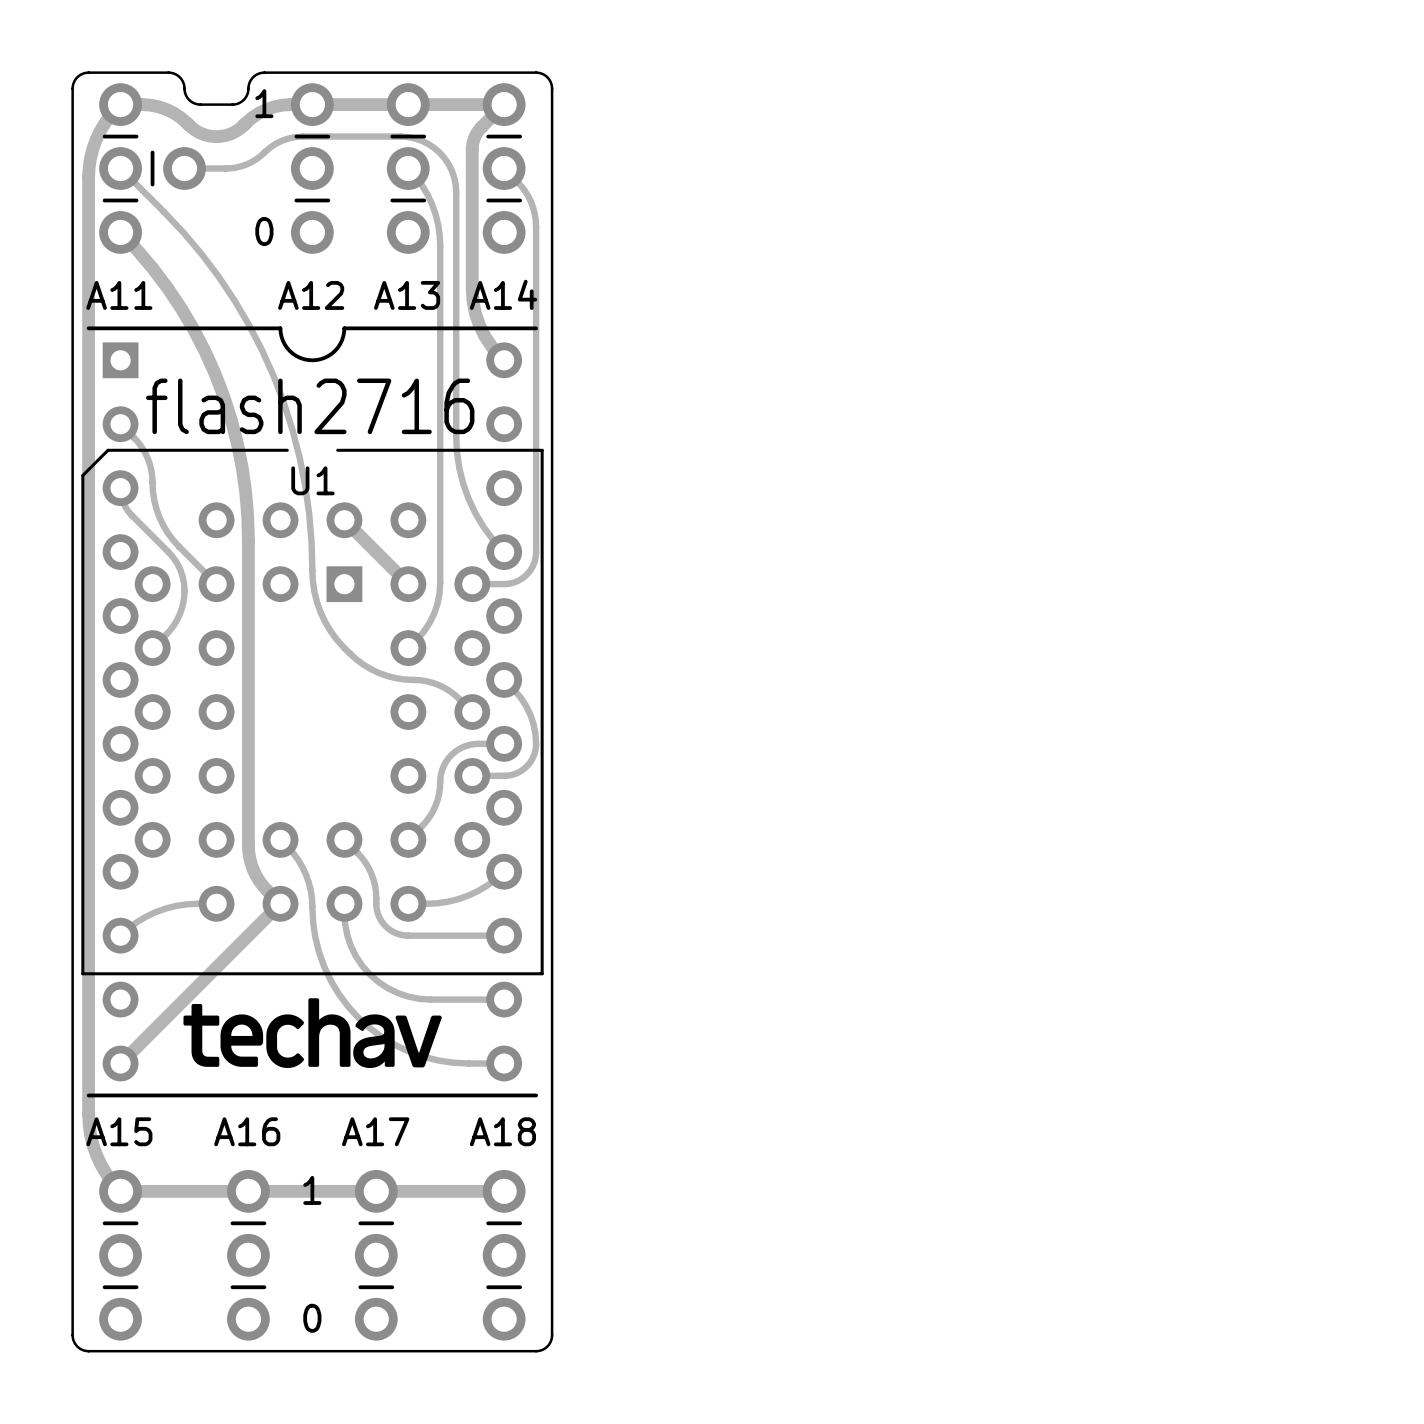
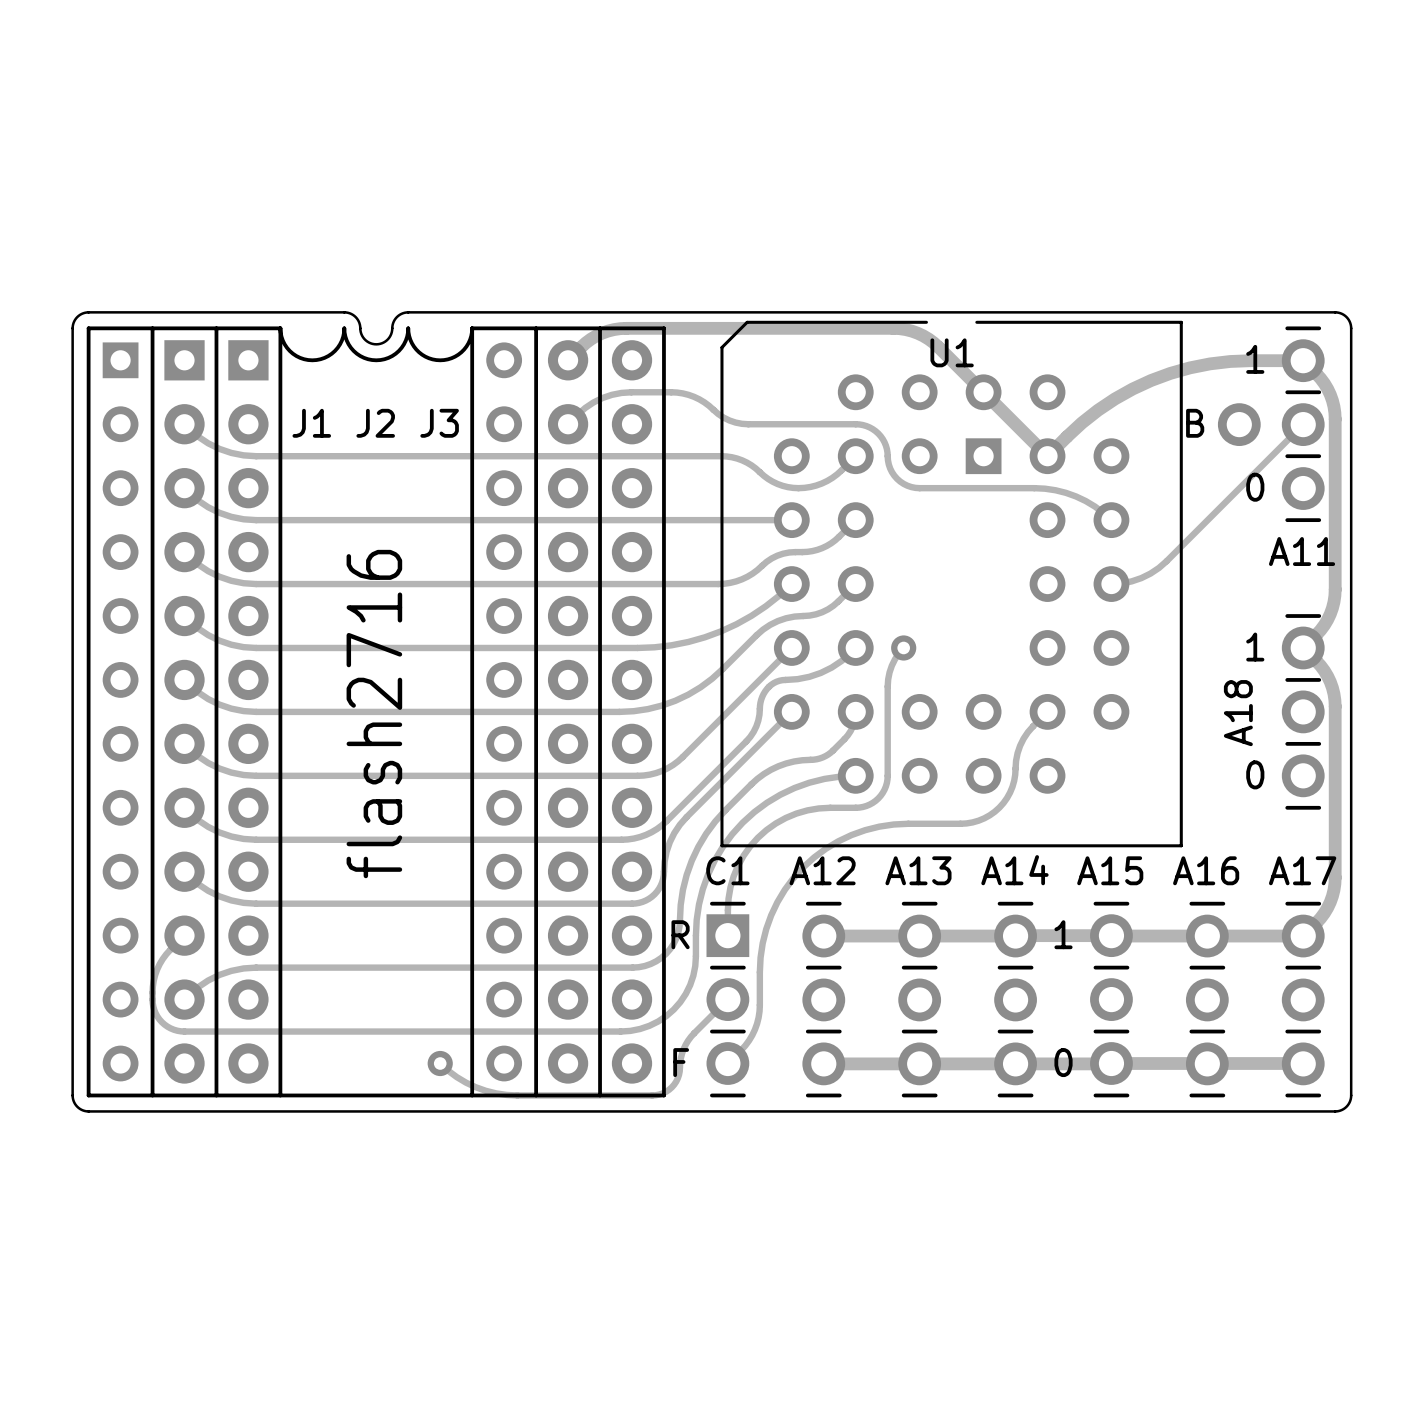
text: 1 (264, 103) -> none
line: (104, 136) (136, 136) -> none
line: (296, 136) (328, 136) -> none
line: (392, 136) (424, 136) -> none
line: (488, 136) (520, 136) -> none
line: (152, 152) (152, 184) -> none
track: (264, 152) (275, 143) (295, 137) (400, 136) (414, 138) (428, 144) (439, 152) (448, 164) (454, 177) (456, 192) (456, 452) (463, 483) (475, 513) (493, 540) (504, 552) -> none
track: (264, 152) (251, 162) (236, 167) (184, 168) -> none
track: (120, 168) (163, 211) (201, 254) (234, 300) (262, 350) (283, 402) (299, 457) (309, 513) (314, 591) (320, 612) (330, 631) (349, 653) (371, 669) (396, 678) (426, 681) (438, 684) (454, 694) (472, 712) -> none
A11 position: (120, 168) -> (1303, 424)
part: (184, 168) -> none
A12 position: (312, 168) -> (823, 999)
track: (408, 168) (421, 185) (431, 203) (438, 224) (440, 245) (439, 593) (429, 623) (408, 648) -> none
A13 position: (408, 168) -> (919, 999)
track: (504, 168) (521, 186) (528, 196) (534, 214) (536, 226) (535, 555) (531, 569) (524, 577) (514, 582) (504, 584) -> (855, 520) (826, 545) (812, 551) (789, 552) (777, 555) (747, 576) (730, 582) (504, 584)
A14 position: (504, 168) -> (1015, 999)
line: (104, 200) (136, 200) -> none
line: (296, 200) (328, 200) -> none
line: (392, 200) (424, 200) -> none
line: (488, 200) (520, 200) -> none
text: 0 (264, 231) -> none
track: (120, 232) (167, 288) (193, 329) (215, 374) (237, 443) (245, 492) (248, 541) (248, 851) (251, 863) (259, 880) (280, 903) -> none
A14 name position: A14 (503, 294) -> A14 (1014, 870)
A12 name position: A12 (311, 295) -> A12 (822, 870)
A13 name position: A13 (407, 295) -> A13 (918, 870)
board edge: (72, 328) (72, 88) (75, 80) (81, 74) (172, 73) (182, 80) (185, 93) (189, 99) (200, 104) (239, 103) (246, 95) (251, 78) (262, 72) (536, 72) (544, 75) (550, 81) (552, 88) (552, 1335) (550, 1342) (544, 1348) (536, 1351) (88, 1351) (81, 1349) (75, 1343) (72, 1335) (72, 1095) -> (72, 328) (77, 317) (86, 312) (344, 312) (355, 317) (363, 337) (368, 342) (376, 344) (383, 342) (389, 337) (396, 317) (408, 312) (1335, 312) (1346, 317) (1351, 328) (1351, 1095) (1349, 1102) (1343, 1109) (1335, 1111) (88, 1111) (77, 1106) (72, 1095)
line: none -> (88, 328) (88, 1095)
line: none -> (152, 328) (152, 1095)
line: none -> (216, 328) (216, 1095)
line: none -> (280, 328) (280, 1095)
line: (344, 328) (472, 328) -> (344, 328) (346, 340) (350, 347) (356, 353) (368, 359) (384, 359) (395, 353) (403, 344) (408, 328) (410, 339) (416, 349) (428, 358) (440, 360) (451, 358) (464, 349) (470, 339) (472, 328) (472, 1095)
line: none -> (536, 328) (663, 328) (663, 1095) (536, 1095) (536, 328)
line: none -> (600, 328) (600, 1095)
line: none -> (1287, 328) (1319, 328)
text: none -> 1 (1255, 359)
track: (504, 360) (491, 347) (479, 325) (473, 301) (472, 288) (472, 143) (479, 129) (504, 104) (282, 105) (258, 113) (233, 132) (216, 136) (199, 132) (174, 113) (158, 106) (120, 104) (100, 130) (92, 148) (88, 177) (88, 1114) (90, 1135) (96, 1155) (106, 1174) (120, 1191) -> none
track: none -> (568, 360) (591, 339) (602, 333) (620, 328) (905, 329) (923, 335) (933, 342) (1047, 456) (1081, 422) (1114, 398) (1151, 380) (1189, 367) (1230, 361) (1303, 360) (1320, 378) (1330, 394) (1335, 419) (1334, 595) (1332, 608) (1324, 625) (1303, 647) (1320, 665) (1327, 676) (1333, 693) (1335, 706) (1334, 883) (1327, 907) (1316, 922) (1303, 936) (823, 936)
line: none -> (1287, 392) (1319, 392)
text rotation: 0° (310, 406) -> 90° counterclockwise (374, 714)
text: none -> J1 (311, 423)
text: none -> B (1195, 423)
track: (120, 424) (138, 442) (144, 452) (151, 470) (154, 500) (159, 517) (167, 532) (184, 552) -> none
track: none -> (184, 424) (208, 443) (231, 452) (243, 455) (726, 456) (746, 462) (777, 484) (798, 488) (816, 485) (827, 480) (837, 474) (855, 456)
track: none -> (568, 424) (585, 407) (611, 394) (631, 392) (671, 392) (694, 396) (723, 417) (741, 423) (862, 425) (872, 429) (880, 436) (885, 445) (891, 472) (897, 478) (907, 485) (919, 488) (1034, 488) (1055, 490) (1085, 501) (1111, 520)
part: none -> (1239, 424)
track: none -> (1303, 424) (1158, 567) (1131, 581) (1111, 584)
line: none -> (1287, 456) (1319, 456)
text: none -> 0 (1255, 487)
track: (120, 488) (122, 499) (127, 509) (173, 557) (182, 576) (184, 596) (179, 614) (170, 629) (152, 648) -> none
track: none -> (184, 488) (197, 500) (219, 512) (243, 519) (256, 520) (791, 520)
track: (344, 520) (408, 584) -> none
line: none -> (1287, 520) (1319, 520)
track: (188, 555) (216, 584) -> (188, 555) (208, 571) (231, 580) (243, 583) (472, 584)
track: none -> (791, 584) (765, 606) (736, 624) (688, 641) (654, 647) (243, 647) (219, 640) (208, 635) (184, 616)
track: none -> (855, 584) (833, 605) (822, 612) (786, 618) (770, 624) (756, 635) (712, 678) (688, 694) (661, 705) (633, 711) (243, 711) (231, 708) (208, 699) (184, 679)
line: none -> (1287, 616) (1319, 616)
track: none -> (855, 647) (841, 660) (820, 672) (797, 679) (779, 680) (771, 684) (762, 696) (756, 726) (746, 741) (662, 825) (651, 832) (633, 838) (243, 838) (219, 832) (208, 826) (184, 807)
track: none -> (903, 647) (891, 665) (888, 679) (887, 775) (882, 792) (875, 800) (862, 807) (818, 808) (796, 813) (775, 823) (757, 837) (743, 855) (733, 876) (728, 898) (727, 935)
via: none -> (903, 647)
text: none -> 1 (1255, 647)
track: (504, 679) (525, 705) (533, 723) (536, 743) (534, 754) (526, 766) (514, 774) (504, 775) -> (791, 647) (682, 757) (661, 770) (637, 775) (504, 775)
line: none -> (1287, 679) (1319, 679)
J2: none -> (376, 711)
J3: none -> (440, 711)
track: none -> (791, 711) (679, 824) (666, 851) (660, 885) (651, 896) (639, 902) (243, 902) (219, 896) (208, 890) (184, 871)
track: none -> (1047, 711) (1023, 738) (1017, 753) (1014, 780) (1010, 792) (1003, 803) (989, 815) (966, 823) (893, 824) (865, 830) (838, 841) (803, 867) (784, 889) (766, 929) (760, 957) (759, 1011) (754, 1029) (745, 1045) (727, 1063)
U1 position: (312, 712) -> (951, 584)
track: none -> (184, 743) (208, 762) (219, 768) (243, 775) (472, 775)
track: (504, 743) (469, 744) (451, 755) (442, 769) (439, 794) (432, 811) (425, 821) (408, 839) -> none
line: none -> (1287, 743) (1319, 743)
text: none -> 0 (1255, 774)
track: none -> (855, 775) (824, 778) (794, 788) (766, 802) (754, 812) (732, 834) (714, 860) (702, 889) (696, 919) (695, 966) (690, 985) (673, 1009) (658, 1021) (640, 1028) (620, 1031) (177, 1030) (167, 1026) (157, 1016) (152, 1003) (152, 986) (155, 975) (162, 959) (184, 935)
line: none -> (1287, 807) (1319, 807)
track: (280, 839) (298, 859) (308, 882) (315, 937) (324, 966) (338, 993) (358, 1017) (369, 1027) (395, 1045) (423, 1056) (453, 1062) (504, 1063) -> none
track: (344, 839) (361, 857) (368, 868) (375, 885) (378, 914) (383, 923) (391, 930) (408, 935) (504, 935) -> none
track: (504, 871) (487, 885) (458, 899) (437, 903) (408, 903) -> none
track: (216, 903) (186, 904) (165, 908) (137, 922) (120, 935) -> none
track: (280, 903) (188, 995) -> (855, 711) (850, 731) (830, 752) (819, 758) (794, 761) (771, 769) (751, 784) (715, 821) (698, 846) (686, 875) (676, 938) (666, 953) (650, 964) (632, 967) (243, 968) (231, 970) (208, 980) (188, 995)
track: (344, 903) (347, 935) (356, 956) (369, 974) (387, 988) (419, 998) (504, 999) -> none
line: none -> (807, 903) (839, 903)
line: none -> (903, 903) (935, 903)
line: none -> (999, 903) (1031, 903)
line: none -> (1095, 903) (1127, 903)
line: none -> (1191, 903) (1223, 903)
line: none -> (1287, 903) (1319, 903)
text: none -> R (680, 934)
text: none -> 1 (1063, 934)
line: none -> (807, 967) (839, 967)
line: none -> (903, 967) (935, 967)
line: none -> (999, 967) (1031, 967)
line: none -> (1095, 967) (1127, 967)
line: none -> (1191, 967) (1223, 967)
line: none -> (1287, 967) (1319, 967)
drawing: [183, 998, 442, 1069] -> none
track: (184, 999) (120, 1063) -> none
track: none -> (727, 999) (688, 1040) (682, 1053) (676, 1081) (669, 1089) (659, 1094) (506, 1094) (485, 1090) (465, 1082) (440, 1063)
C1: none -> (727, 999)
line: none -> (807, 1031) (839, 1031)
line: none -> (903, 1031) (935, 1031)
line: none -> (999, 1031) (1031, 1031)
line: none -> (1095, 1031) (1127, 1031)
line: none -> (1191, 1031) (1223, 1031)
line: none -> (1287, 1031) (1319, 1031)
text: none -> F (681, 1062)
text: none -> 0 (1063, 1062)
via: none -> (440, 1063)
track: none -> (823, 1063) (1303, 1063)
line: none -> (903, 1095) (935, 1095)
line: none -> (999, 1095) (1031, 1095)
line: none -> (1095, 1095) (1127, 1095)
line: none -> (1191, 1095) (1223, 1095)
line: none -> (1287, 1095) (1319, 1095)
A15 name position: A15 (119, 1131) -> A15 (1110, 870)
A16 name position: A16 (247, 1131) -> A16 (1206, 870)
A17 name position: A17 (375, 1131) -> A17 (1302, 870)
A18 name rotation: 0° (502, 1131) -> 90° counterclockwise (1238, 713)
A18 name position: A18 (502, 1131) -> A18 (1238, 713)
text: 1 (312, 1190) -> none
track: (120, 1191) (504, 1191) -> none
line: (104, 1223) (136, 1223) -> none
line: (232, 1223) (264, 1223) -> (711, 903) (743, 903)
line: (360, 1223) (392, 1223) -> (711, 967) (743, 967)
line: (488, 1223) (520, 1223) -> (711, 1031) (743, 1031)
A15 position: (120, 1255) -> (1111, 999)
A16 position: (248, 1255) -> (1207, 999)
A17 position: (376, 1255) -> (1303, 999)
A18 position: (504, 1255) -> (1303, 711)
line: (104, 1287) (136, 1287) -> none
line: (232, 1287) (264, 1287) -> none
line: (360, 1287) (392, 1287) -> (807, 1095) (839, 1095)
line: (488, 1287) (520, 1287) -> (711, 1095) (743, 1095)
text: 0 (312, 1318) -> none

